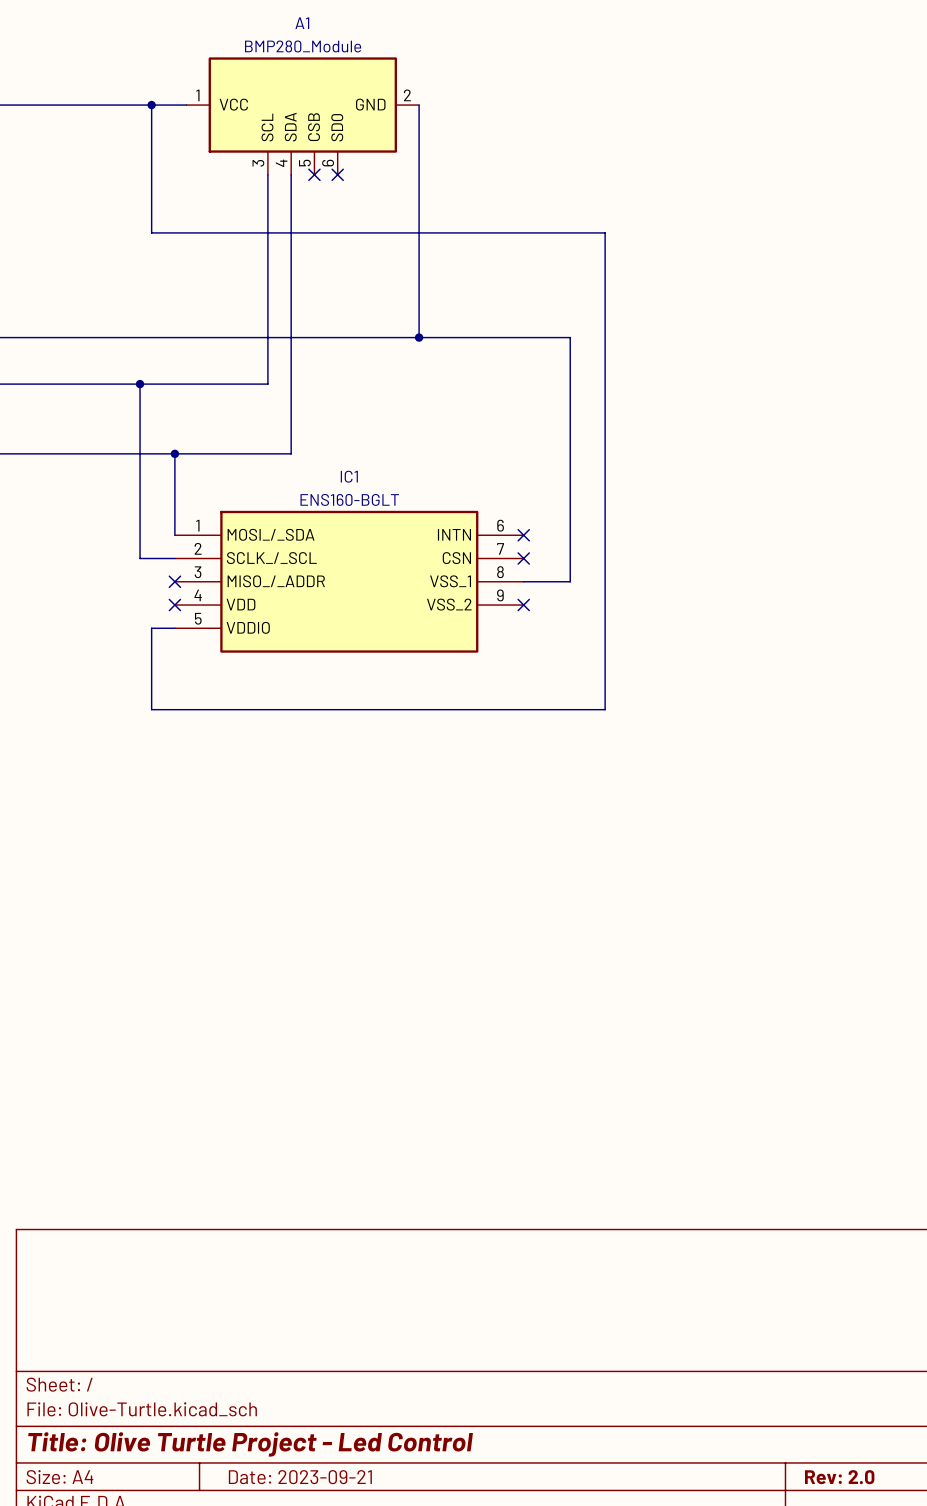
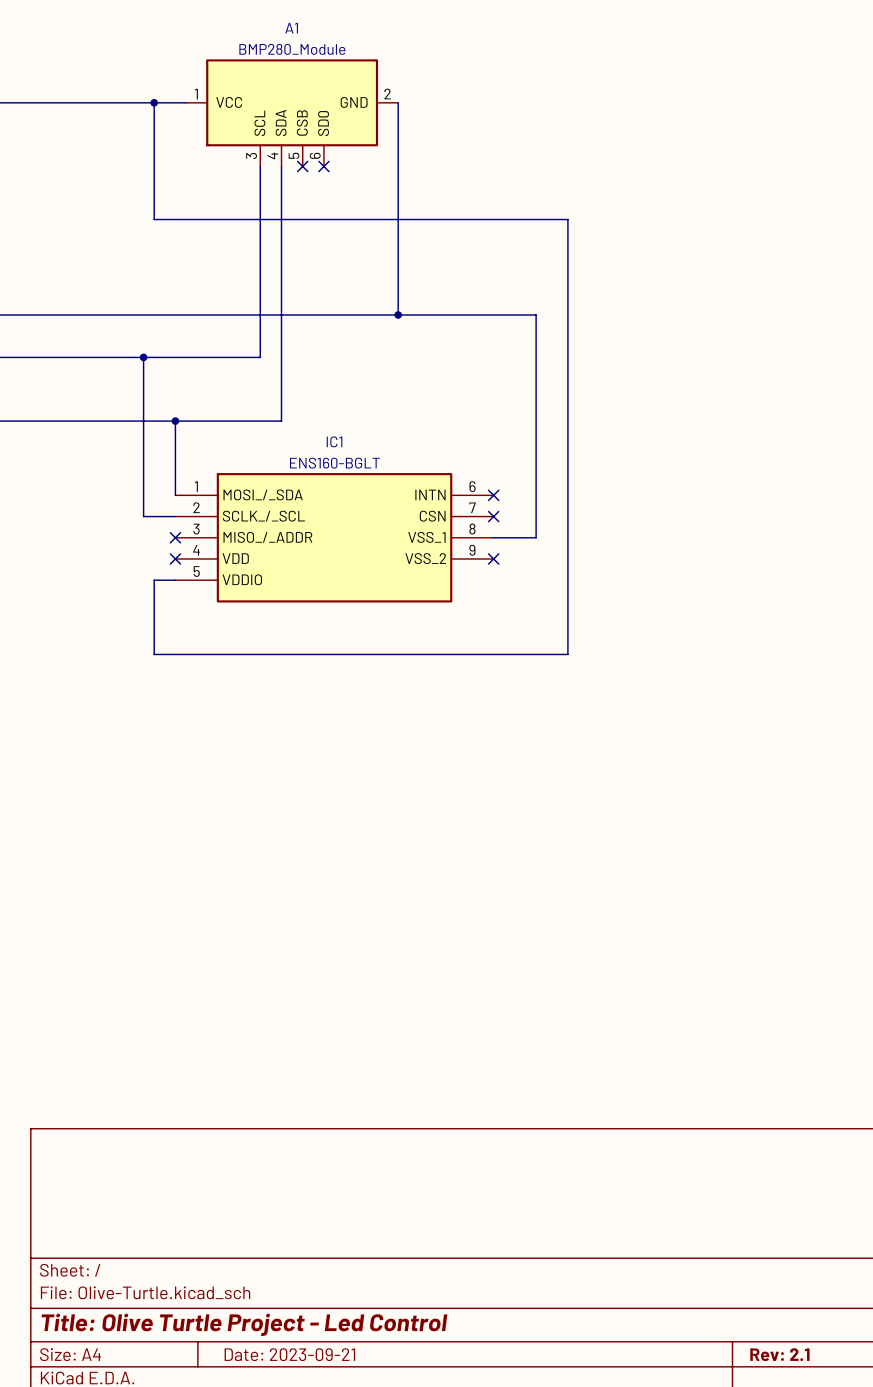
title block: Rev: 2.0 (839, 1477) -> Rev: 2.1 (779, 1354)

